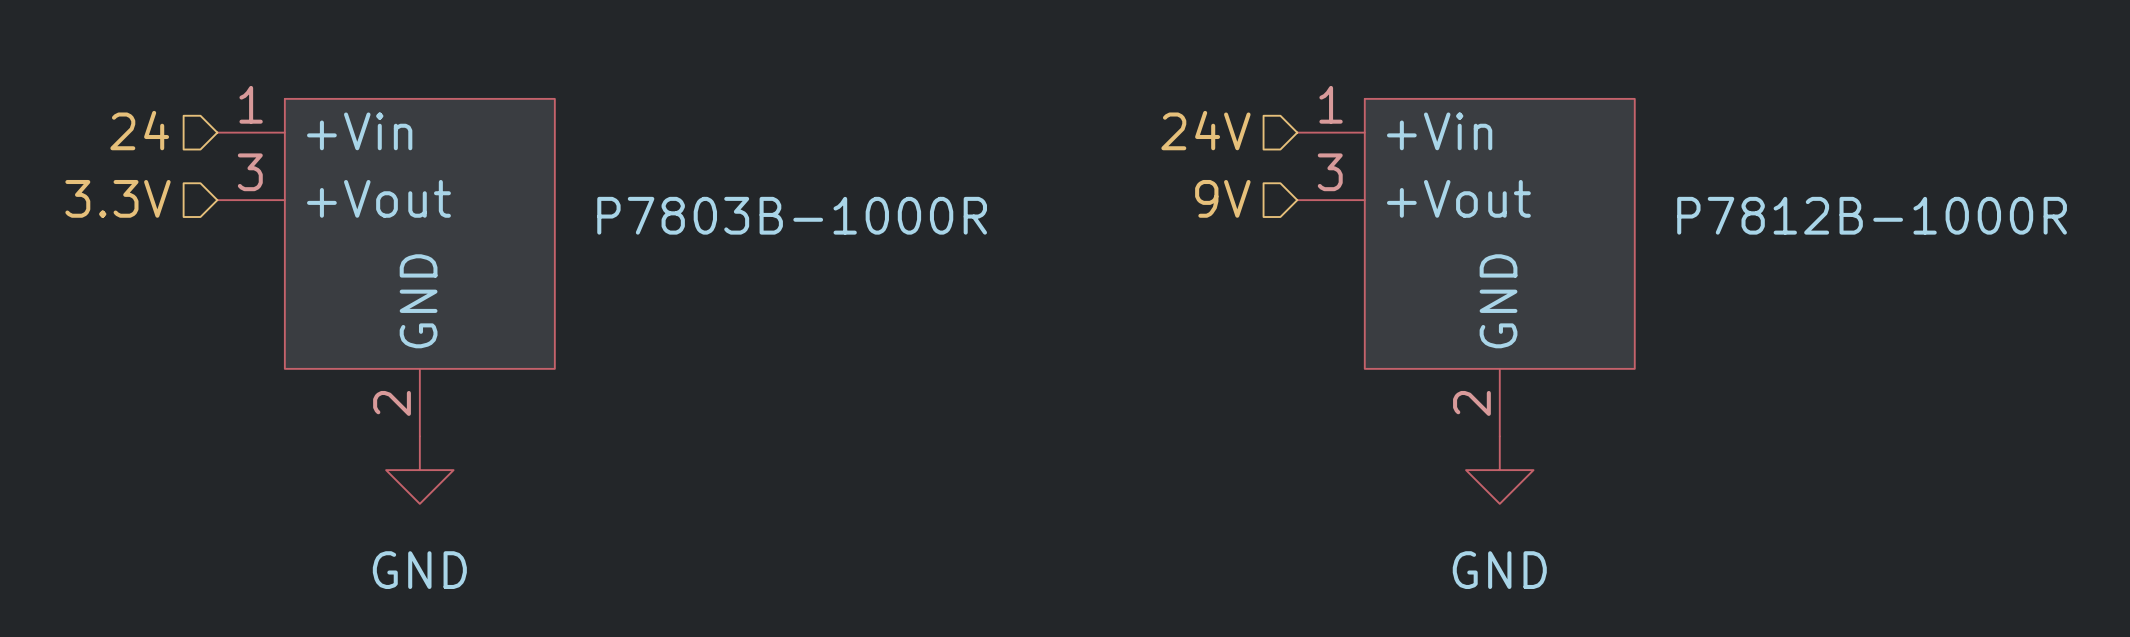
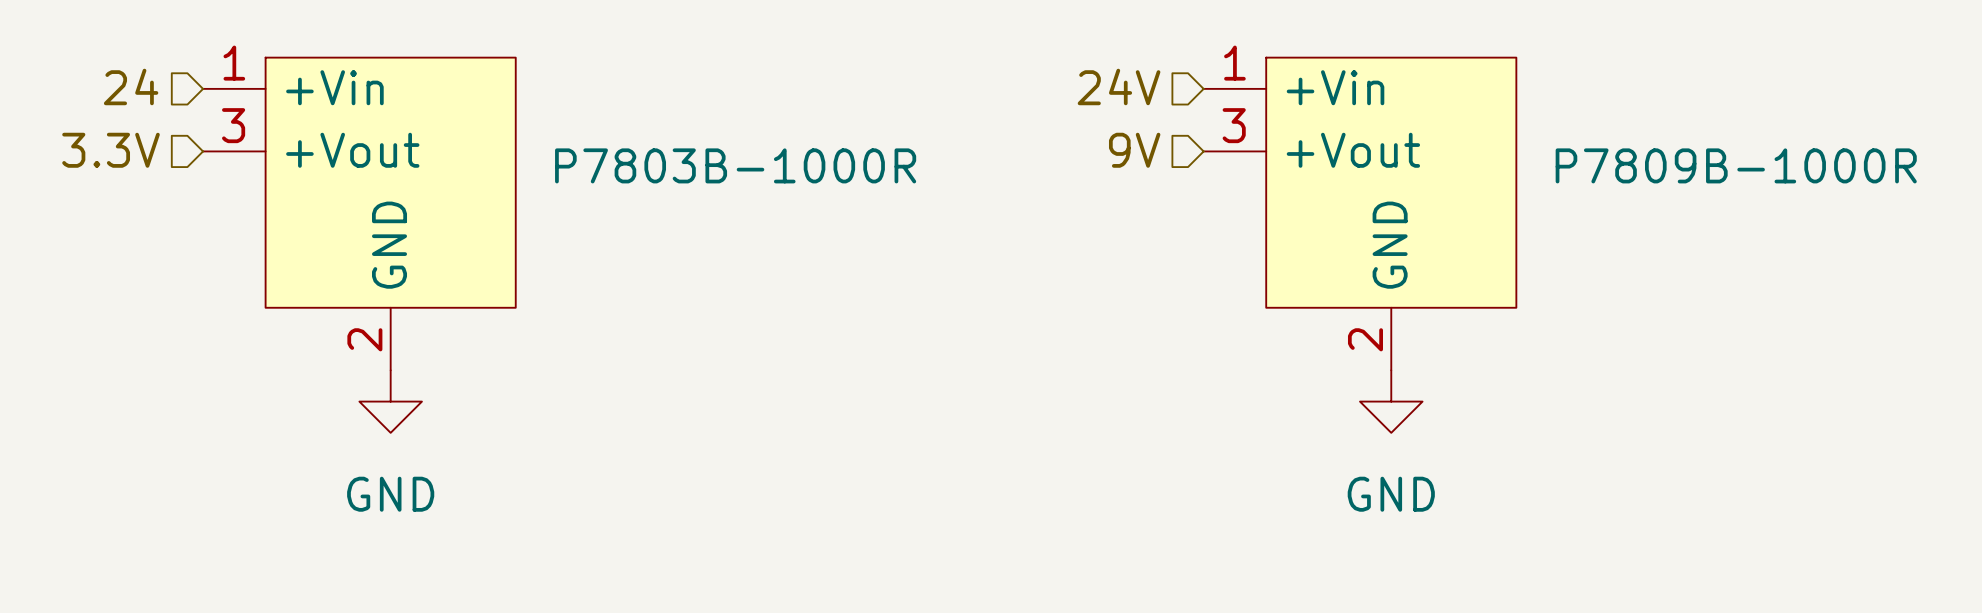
P7812B-1000R name: P7812B-1000R (1872, 215) -> P7809B-1000R (1736, 165)

